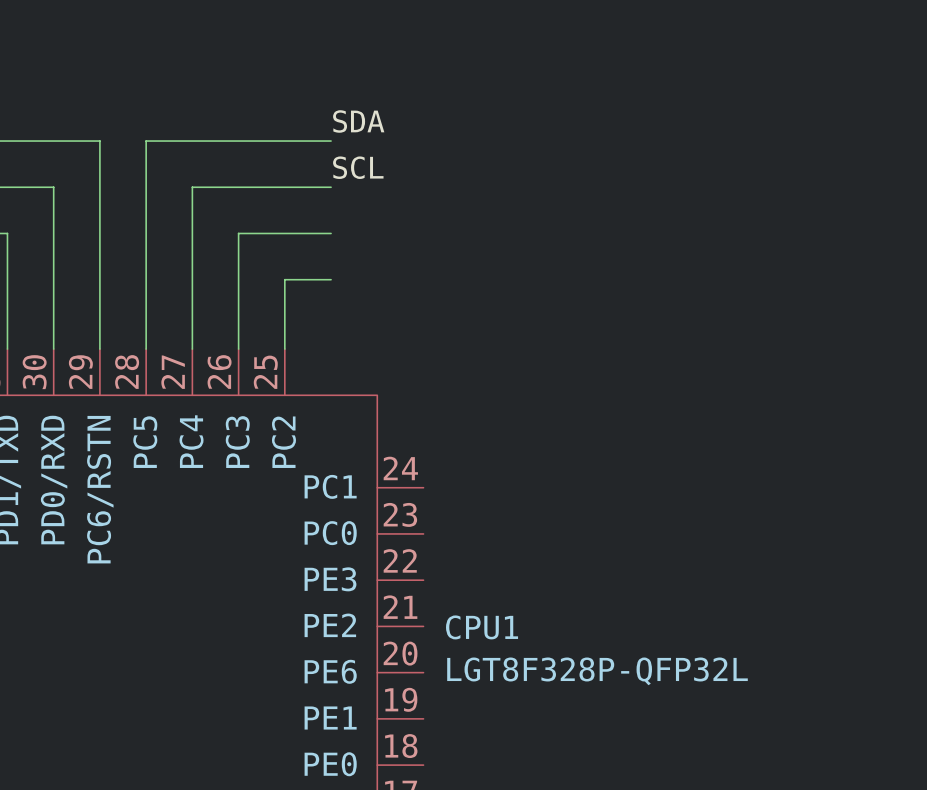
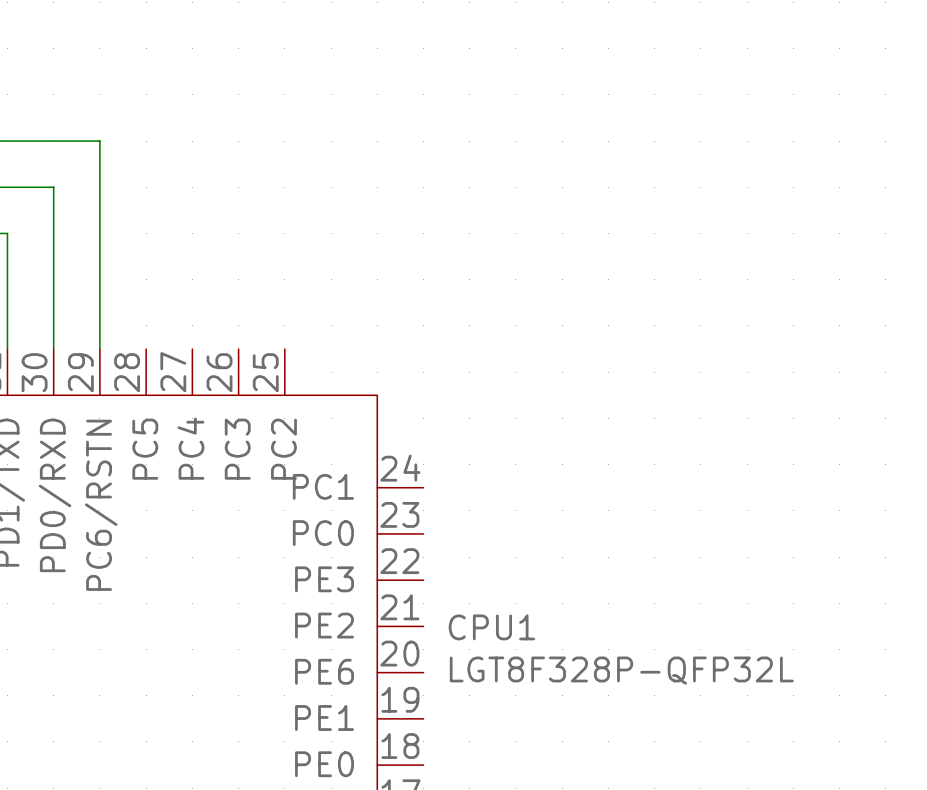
label: SDA (358, 121) -> none
wire: (331, 141) (146, 141) (146, 349) -> none
label: SCL (358, 167) -> none
wire: (331, 187) (192, 187) (192, 349) -> none
wire: (331, 233) (238, 233) (238, 349) -> none
wire: (331, 279) (284, 279) (284, 349) -> none

